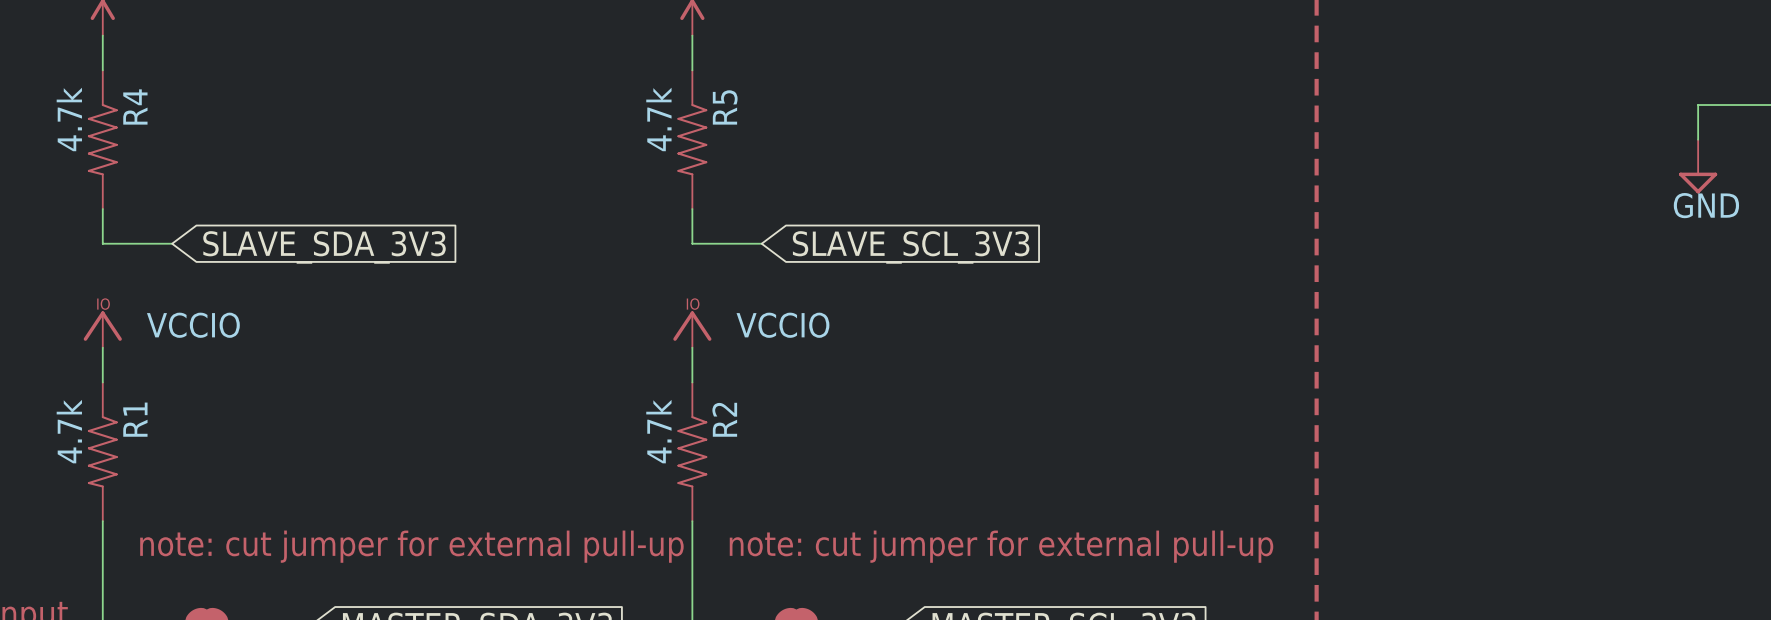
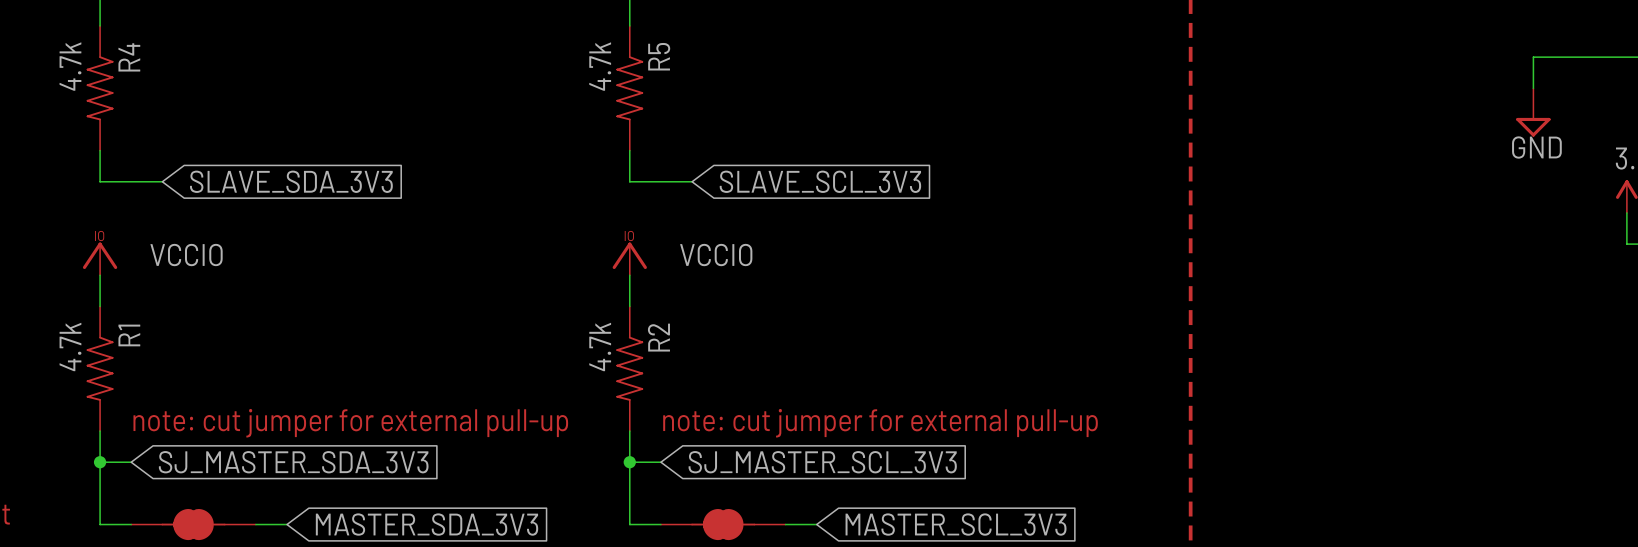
text position: note: cut jumper for external pull-up (411, 546) -> note: cut jumper for external pull-up (350, 423)
text position: note: cut jumper for external pull-up (1001, 546) -> note: cut jumper for external pull-up (880, 423)
wire: none -> (100, 462) (131, 462)
junction: none -> (100, 462)
wire: none -> (629, 462) (660, 462)
junction: none -> (629, 462)
global label: none -> SJ_MASTER_SDA_3V3 (293, 462)
global label: none -> SJ_MASTER_SCL_3V3 (822, 462)

